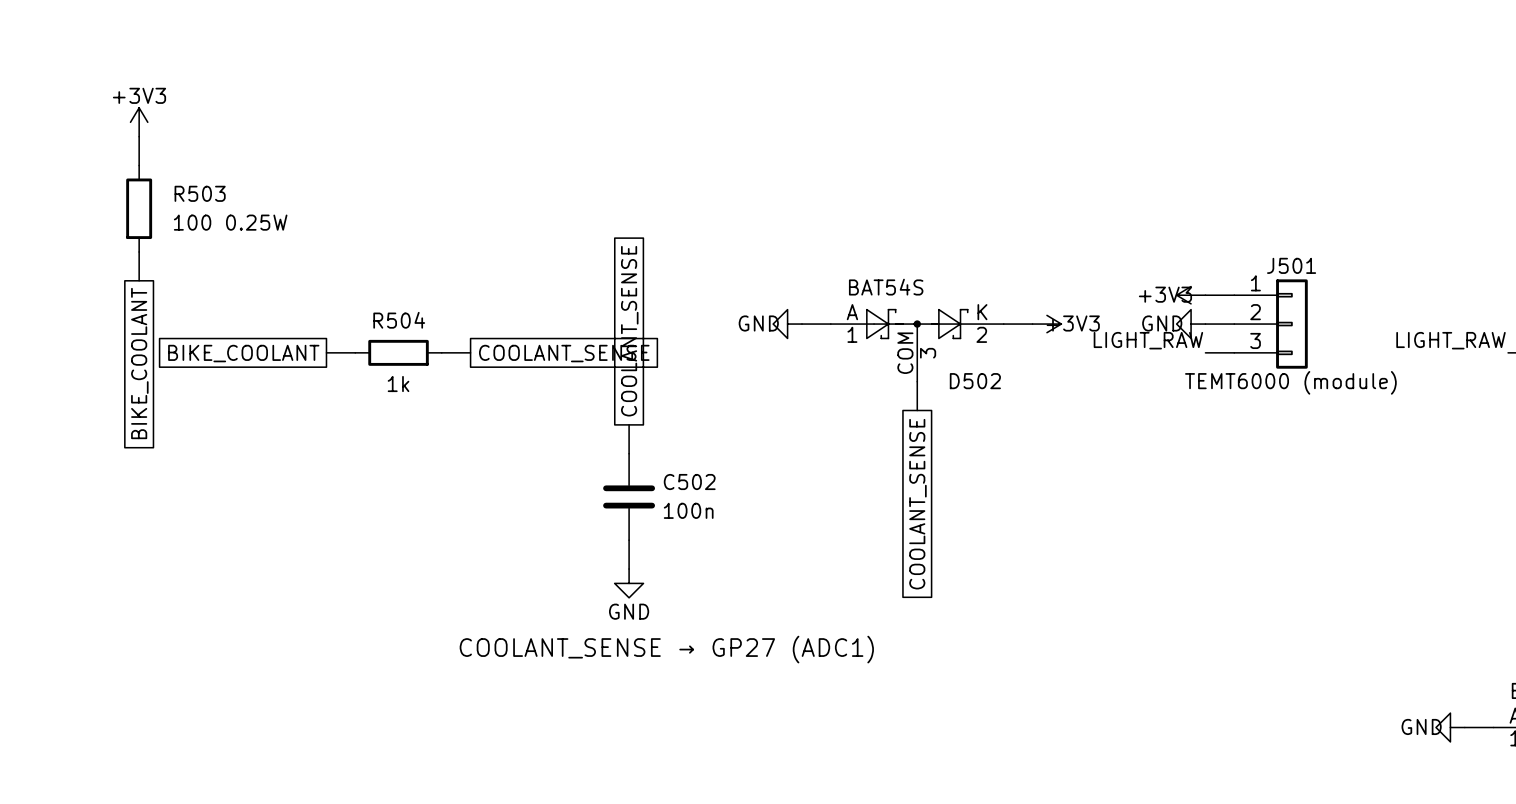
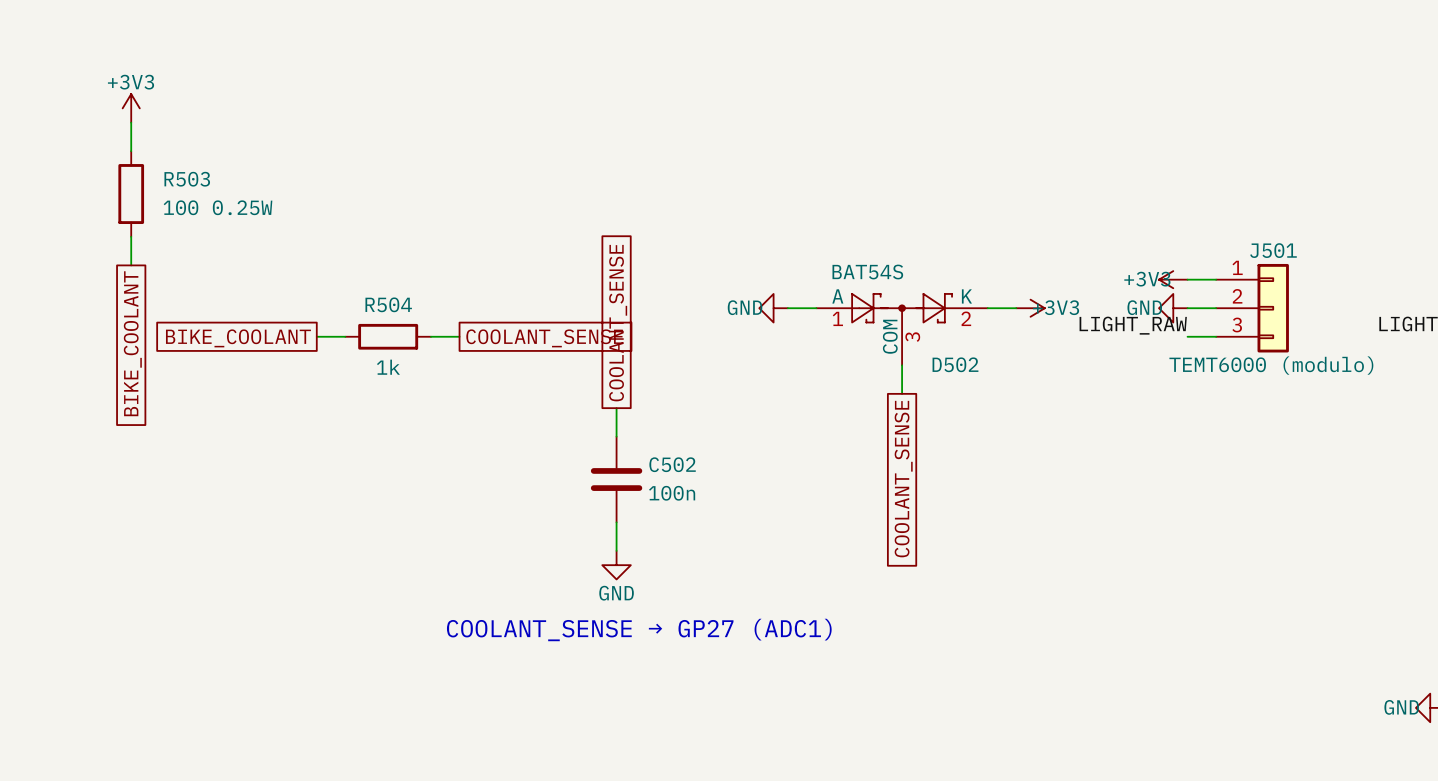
J501 value: TEMT6000 (module) (1290, 382) -> TEMT6000 (modulo) (1271, 365)

